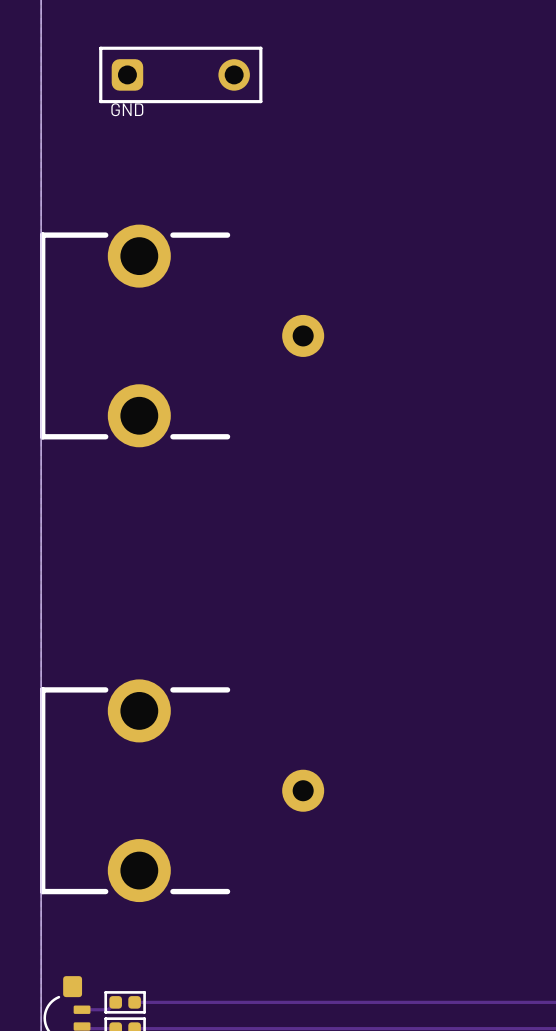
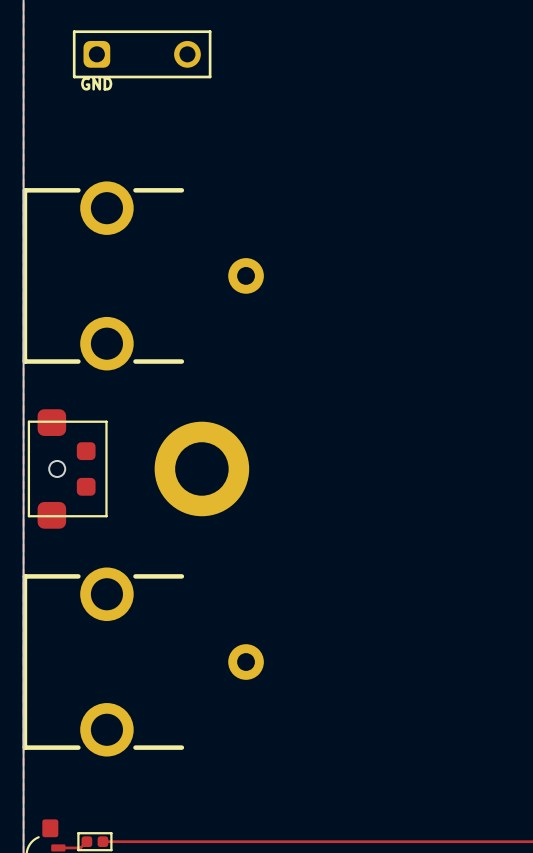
part: none -> (67, 468)
part: none -> (201, 468)

